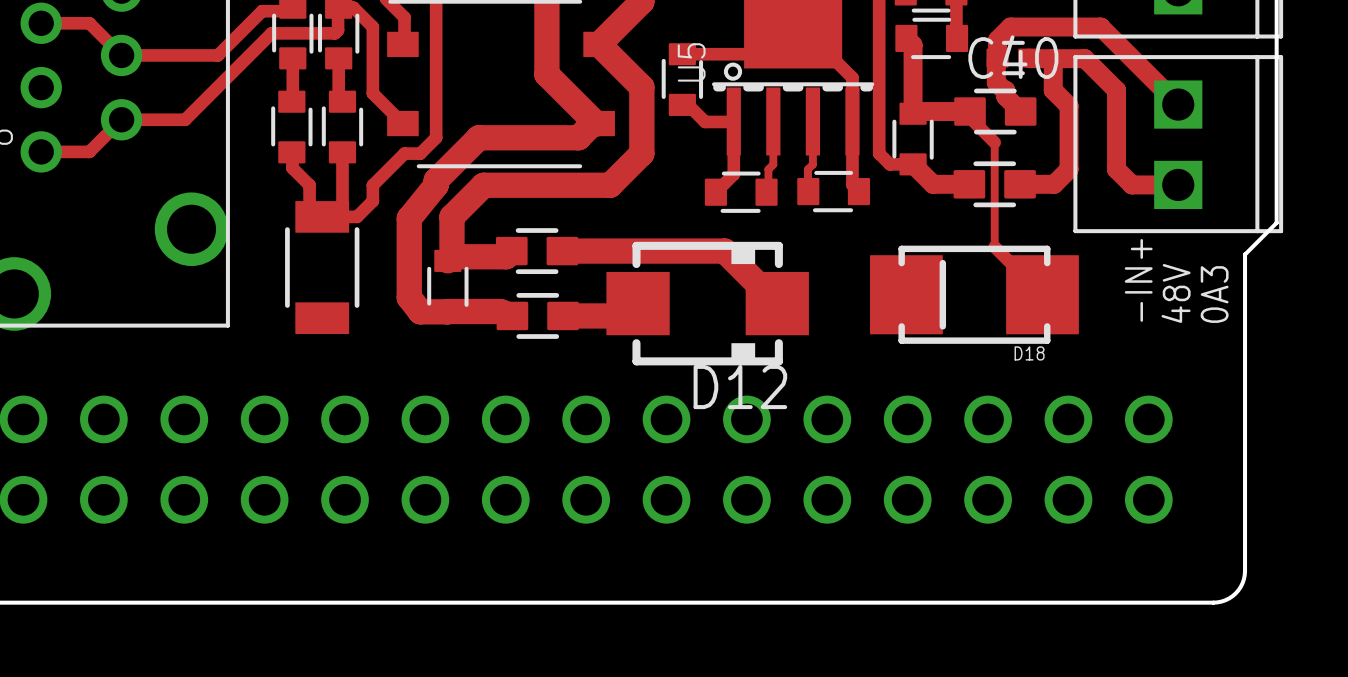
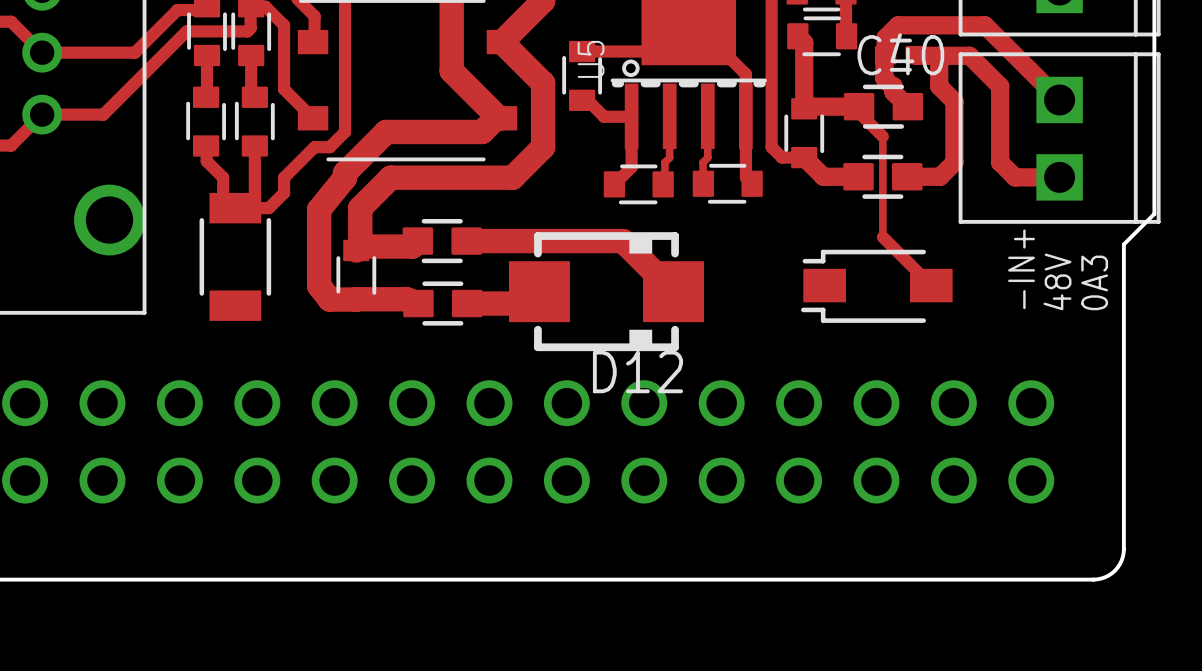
D18: (974, 294) -> none
part: none -> (876, 286)

